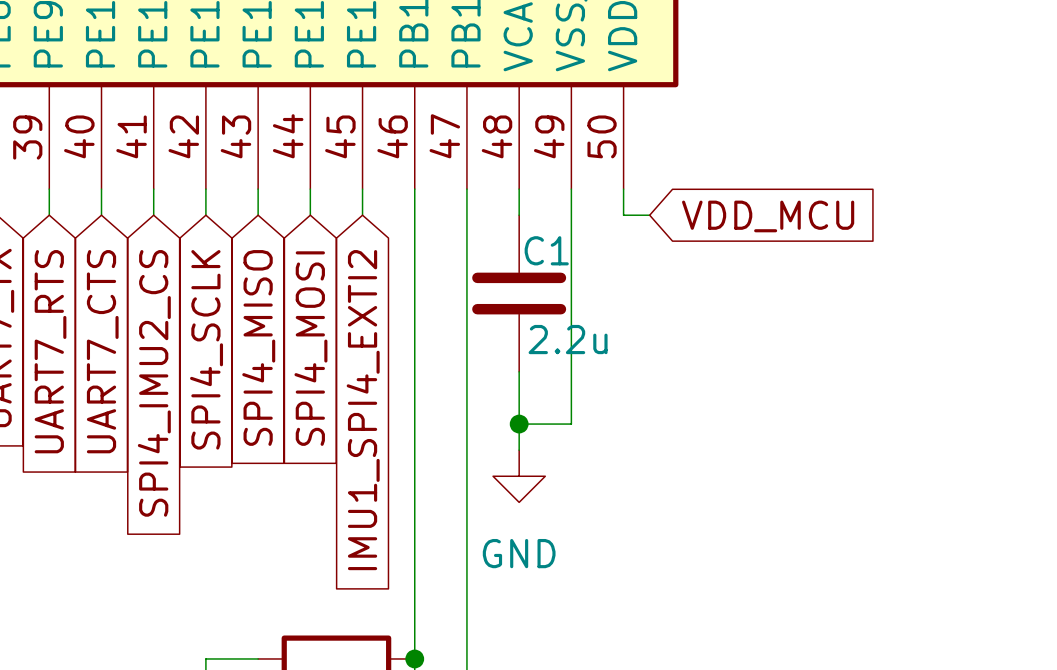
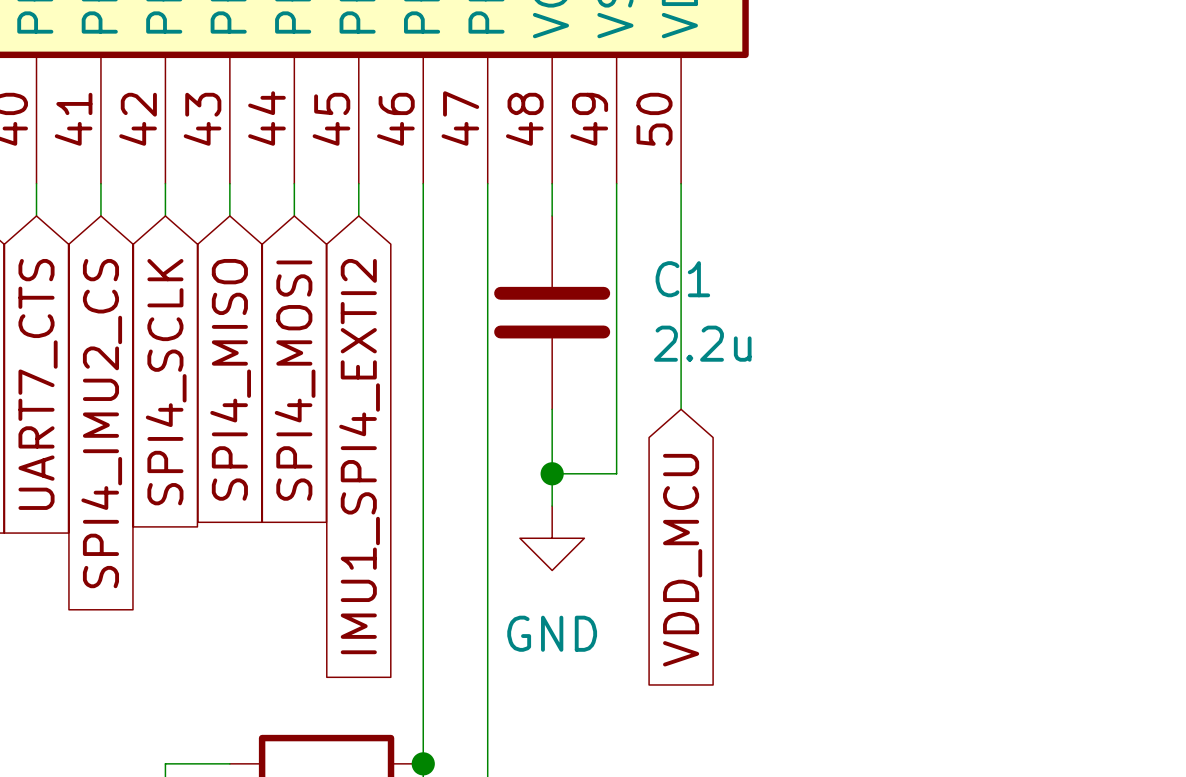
wire: (623, 215) (649, 215) -> (681, 215) (681, 409)
global label rotation: 0° (768, 216) -> 90° clockwise (682, 560)
global label position: VDD_MCU (768, 216) -> VDD_MCU (682, 560)
C1 name position: C1 (546, 250) -> C1 (682, 279)
C1 value position: 2.2u (568, 339) -> 2.2u (702, 343)

